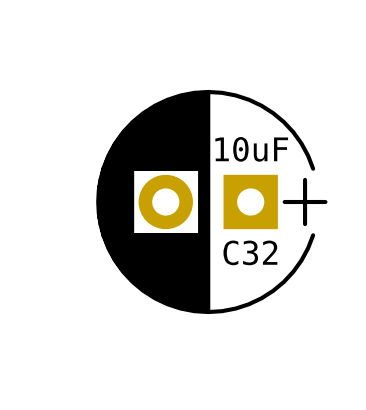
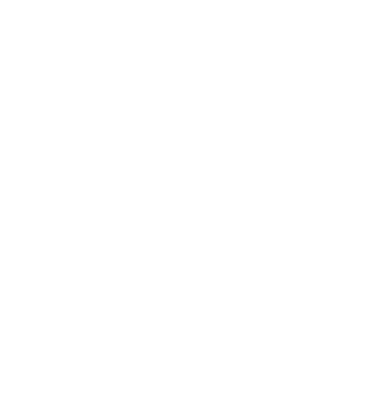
C32: 10uF (211, 202) -> none

